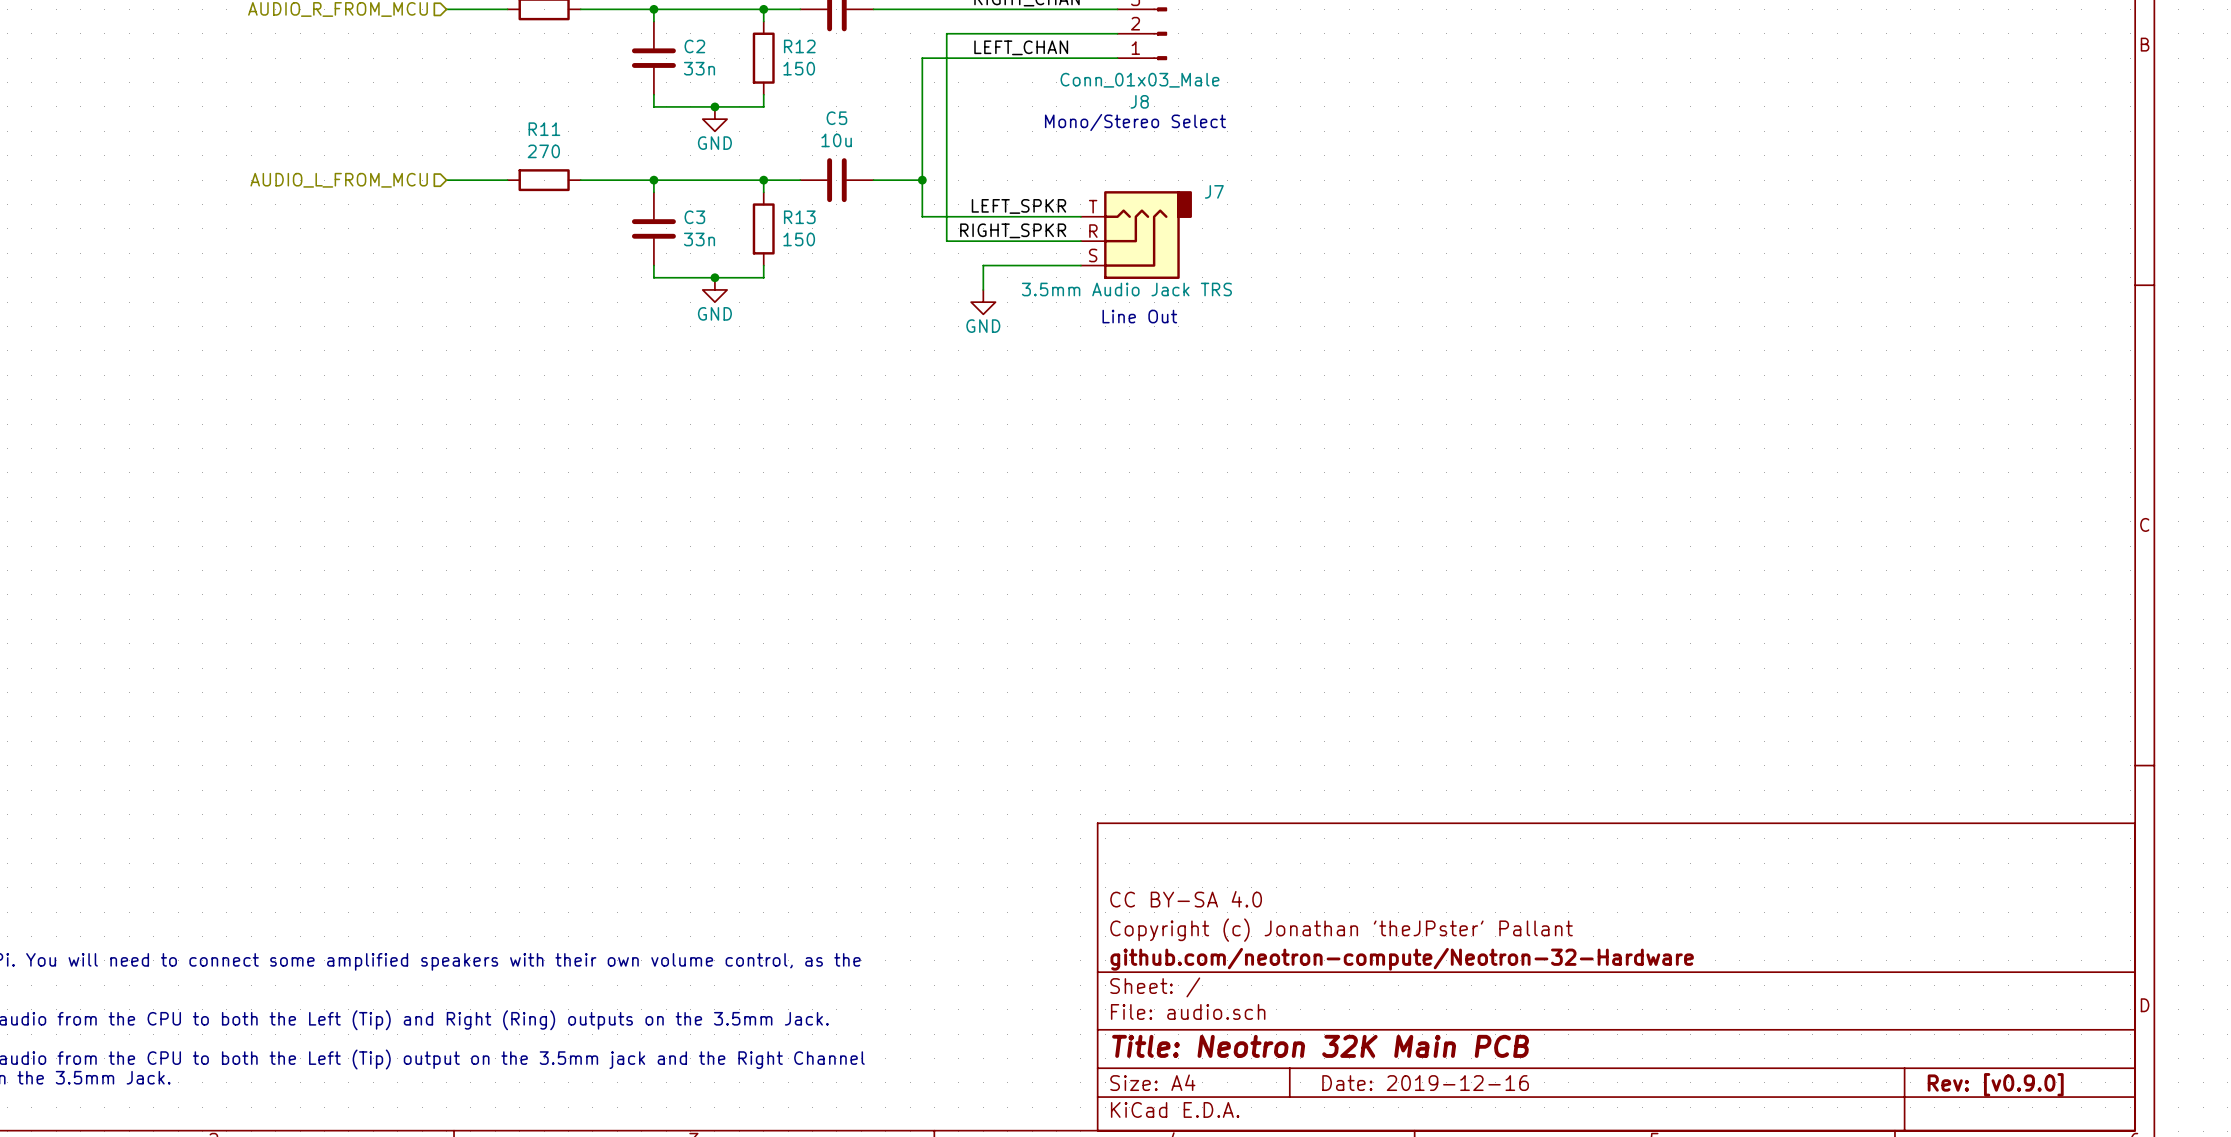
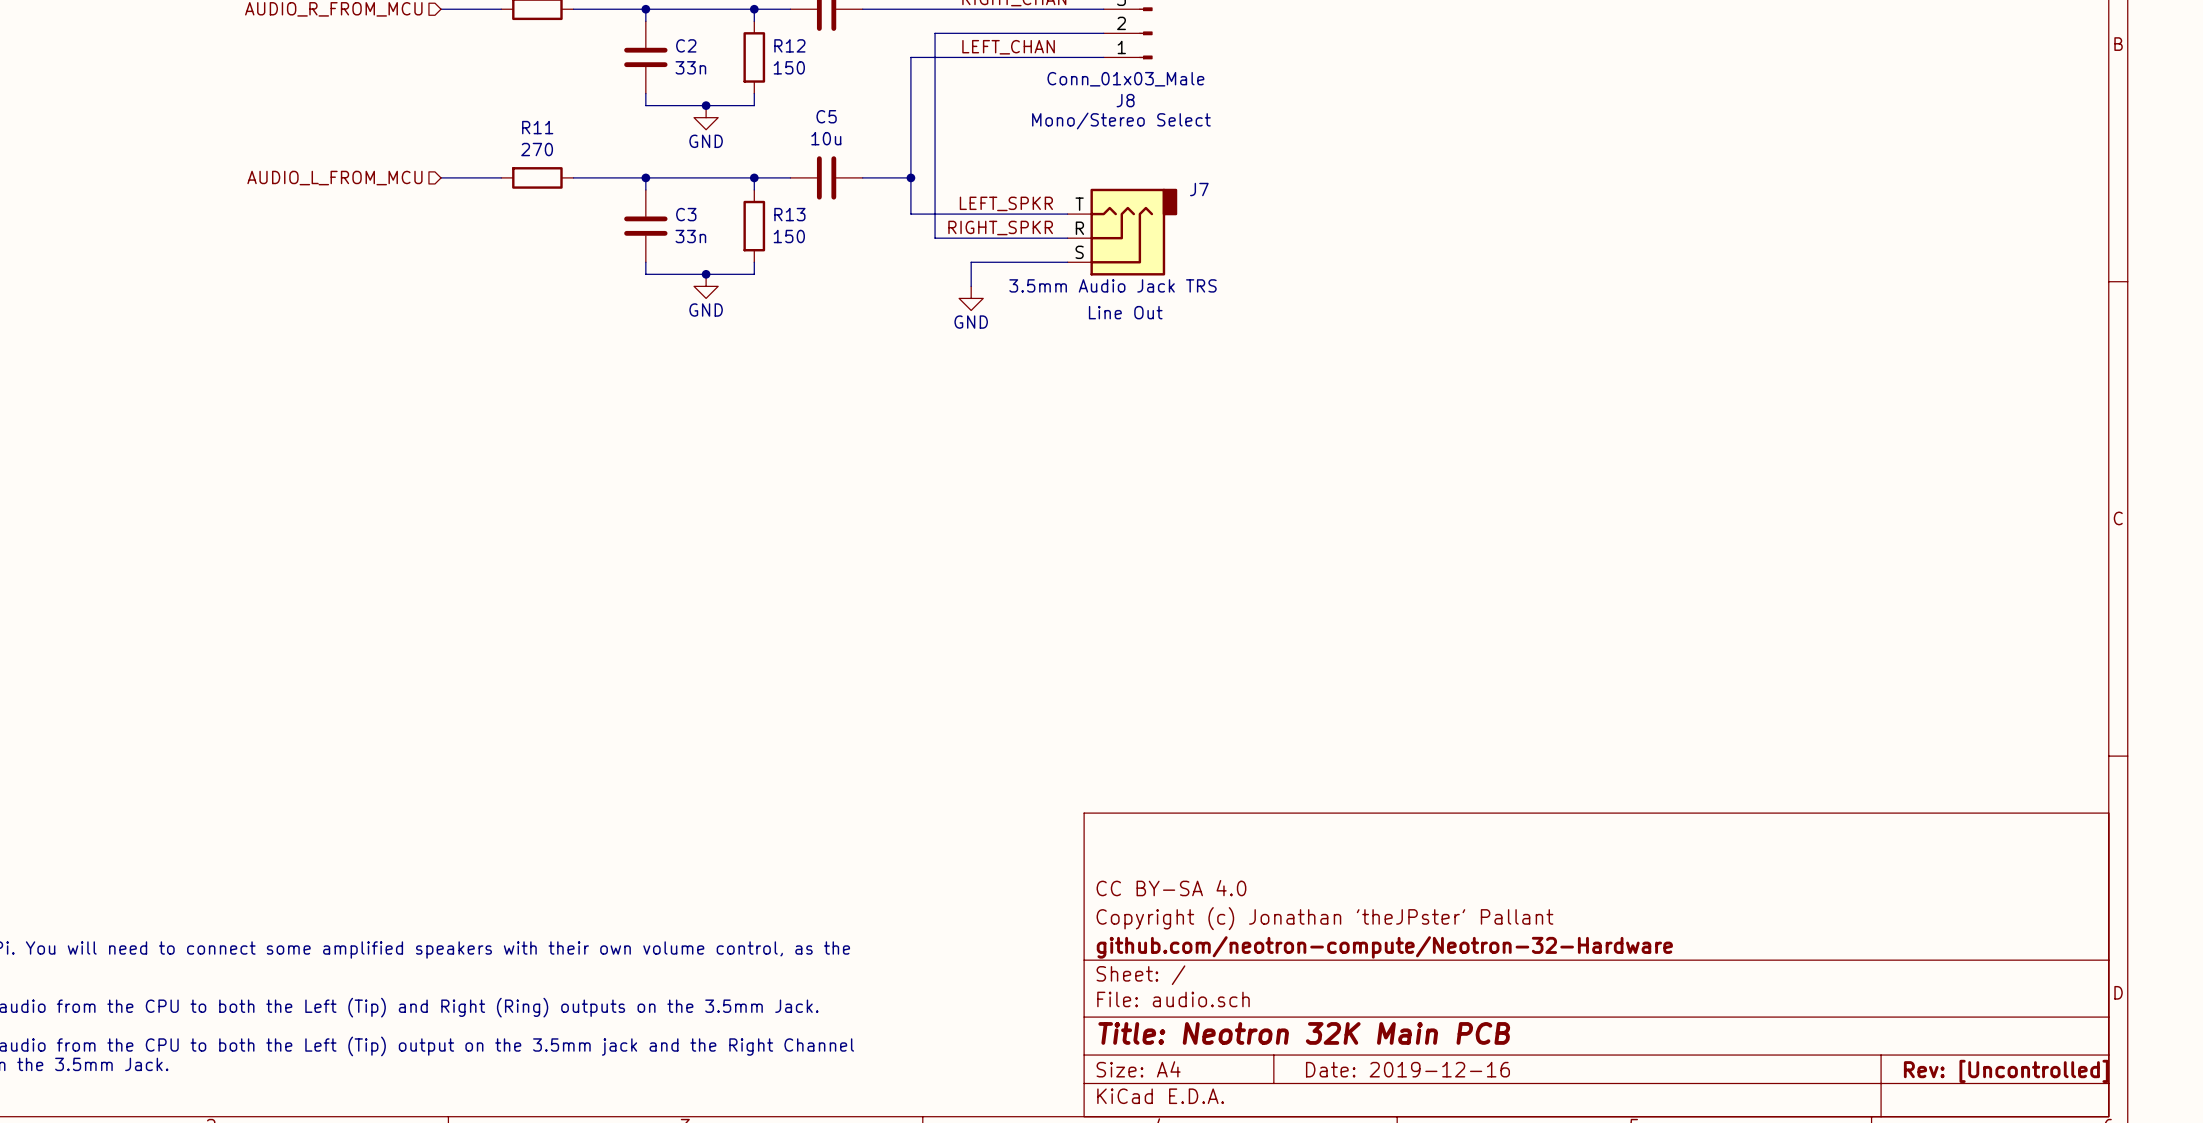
title block: Rev: [v0.9.0] (1995, 1084) -> Rev: [Uncontrolled] (2006, 1071)

